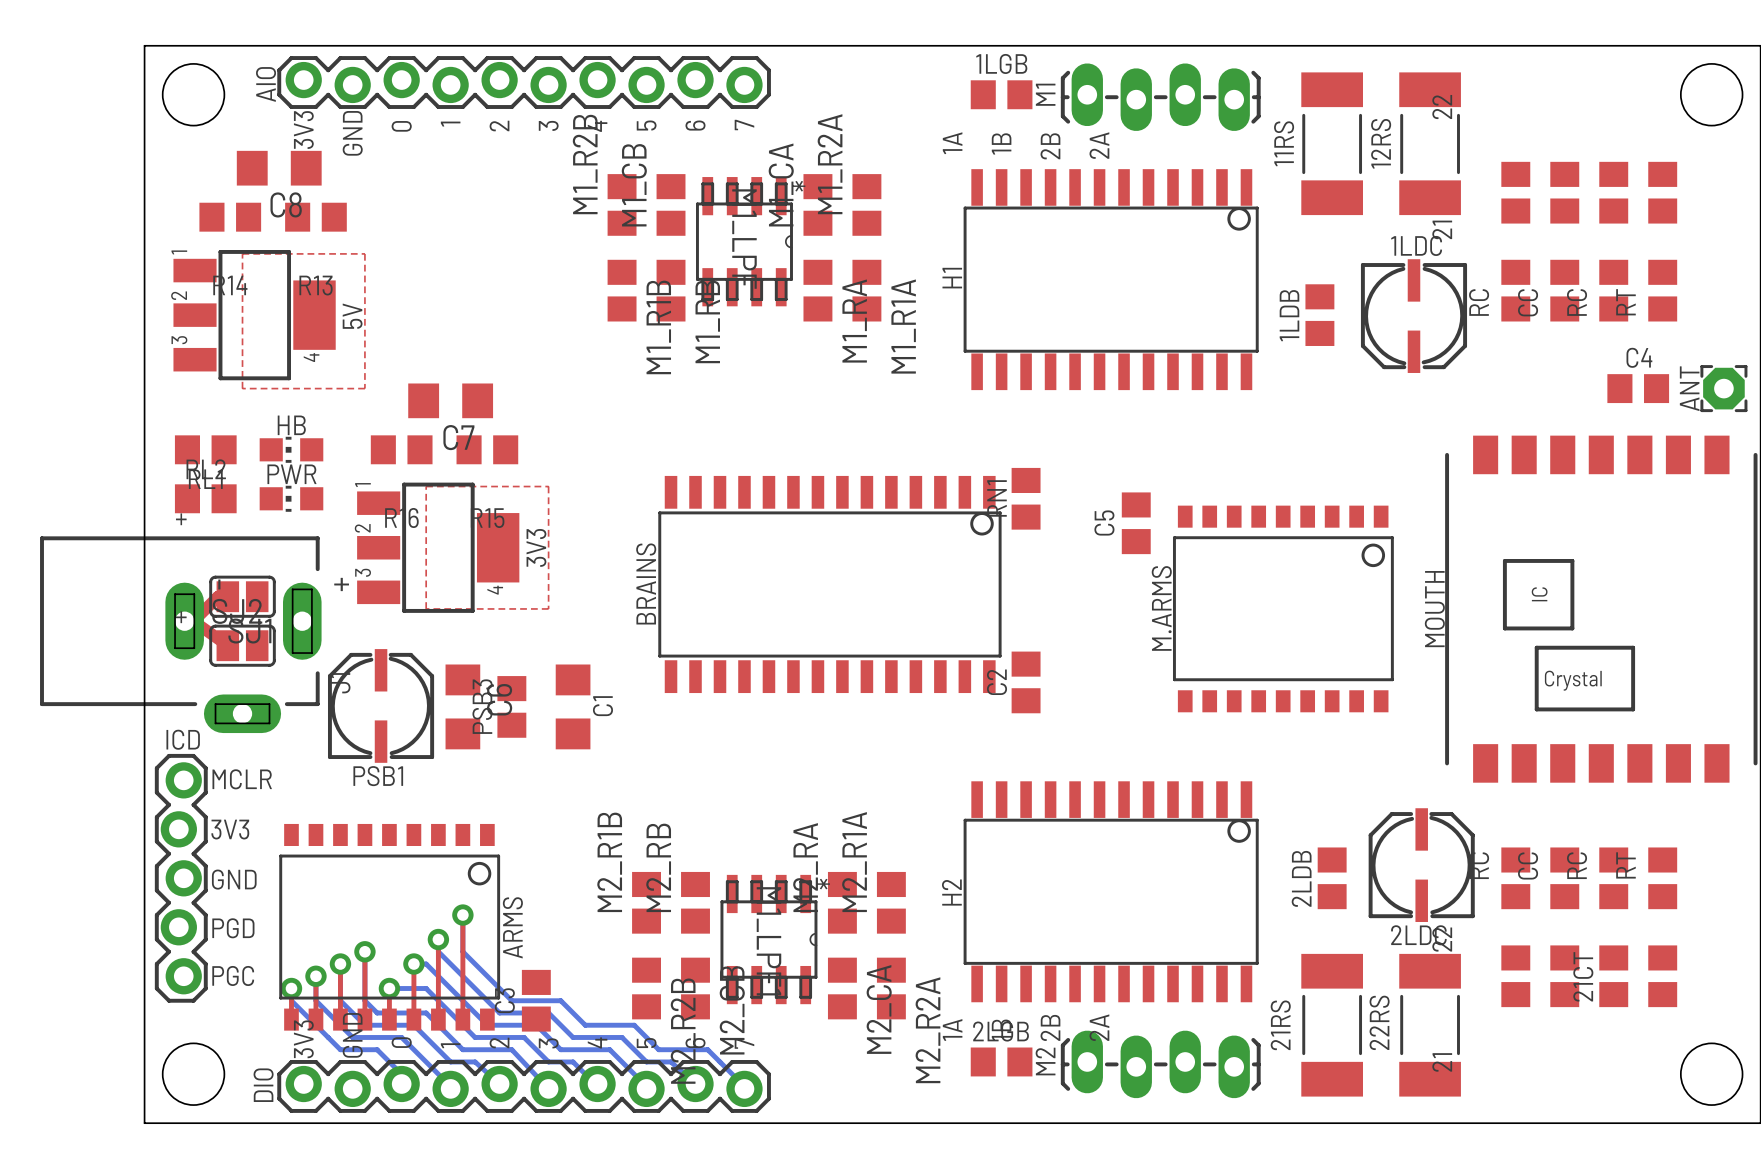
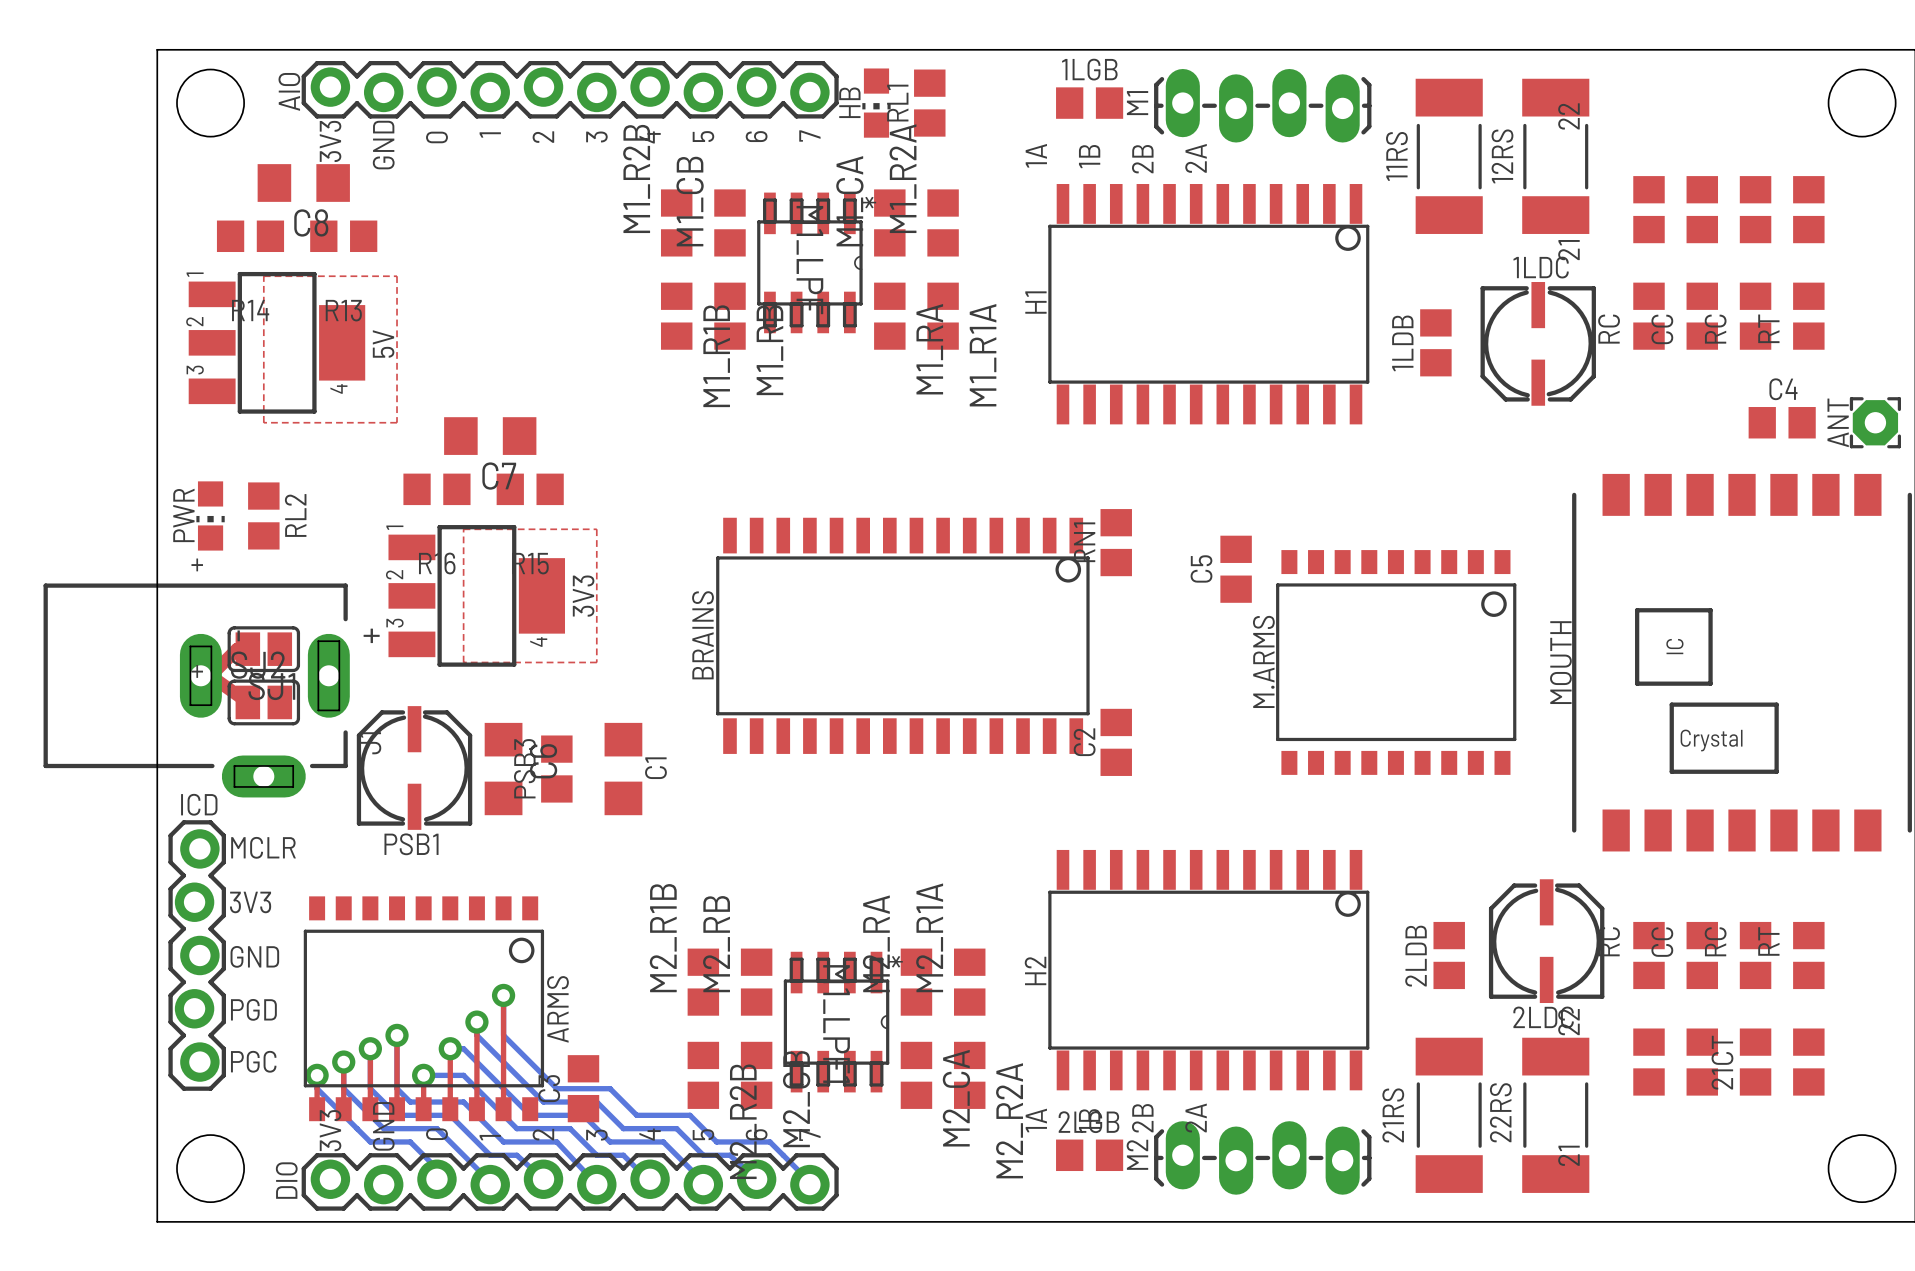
HB: none -> (876, 103)
RL1 rotation: 0° (205, 449) -> 90° clockwise (929, 103)
RL1 position: (205, 449) -> (929, 103)
HB: (291, 449) -> none
RL2 rotation: 0° (205, 498) -> 90° clockwise (263, 515)
RL2 position: (205, 498) -> (263, 515)
PWR rotation: 0° (291, 498) -> 90° counterclockwise (210, 515)
PWR position: (291, 498) -> (210, 515)

